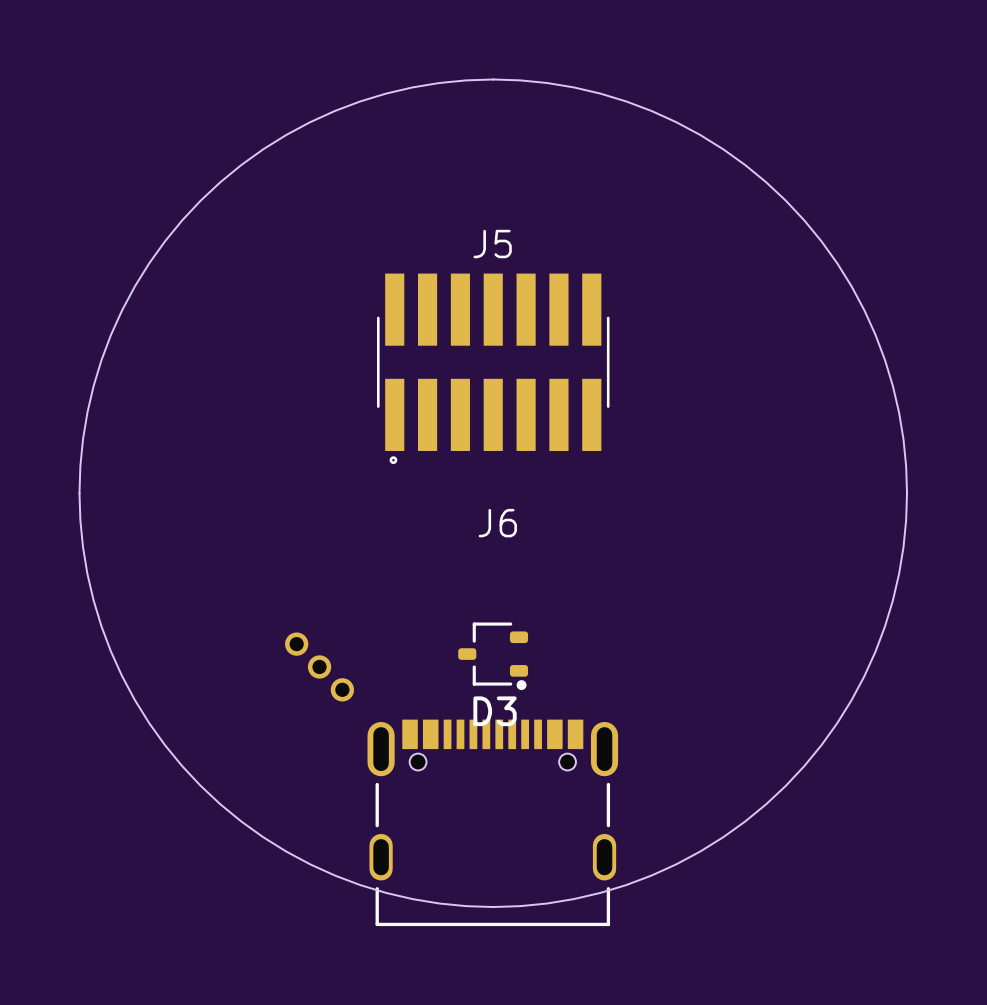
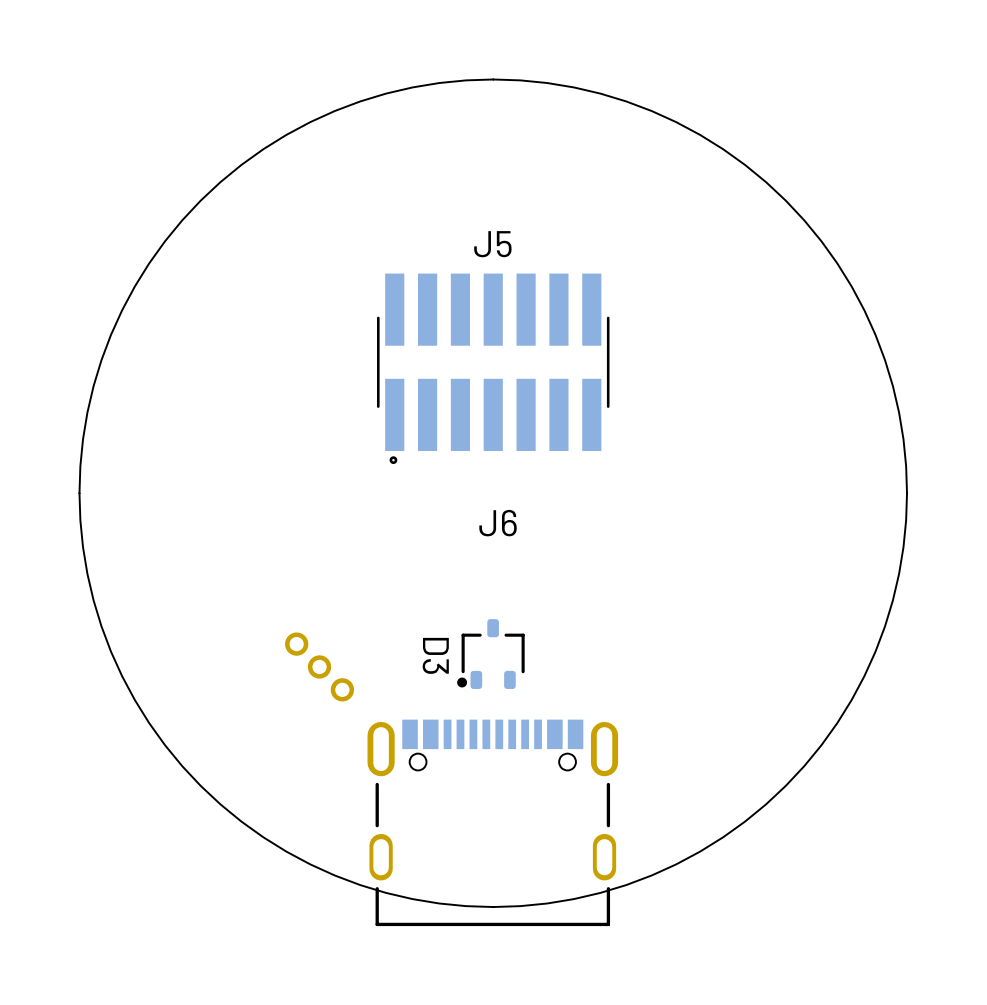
D3 rotation: 0° (493, 656) -> 90° clockwise (490, 654)

